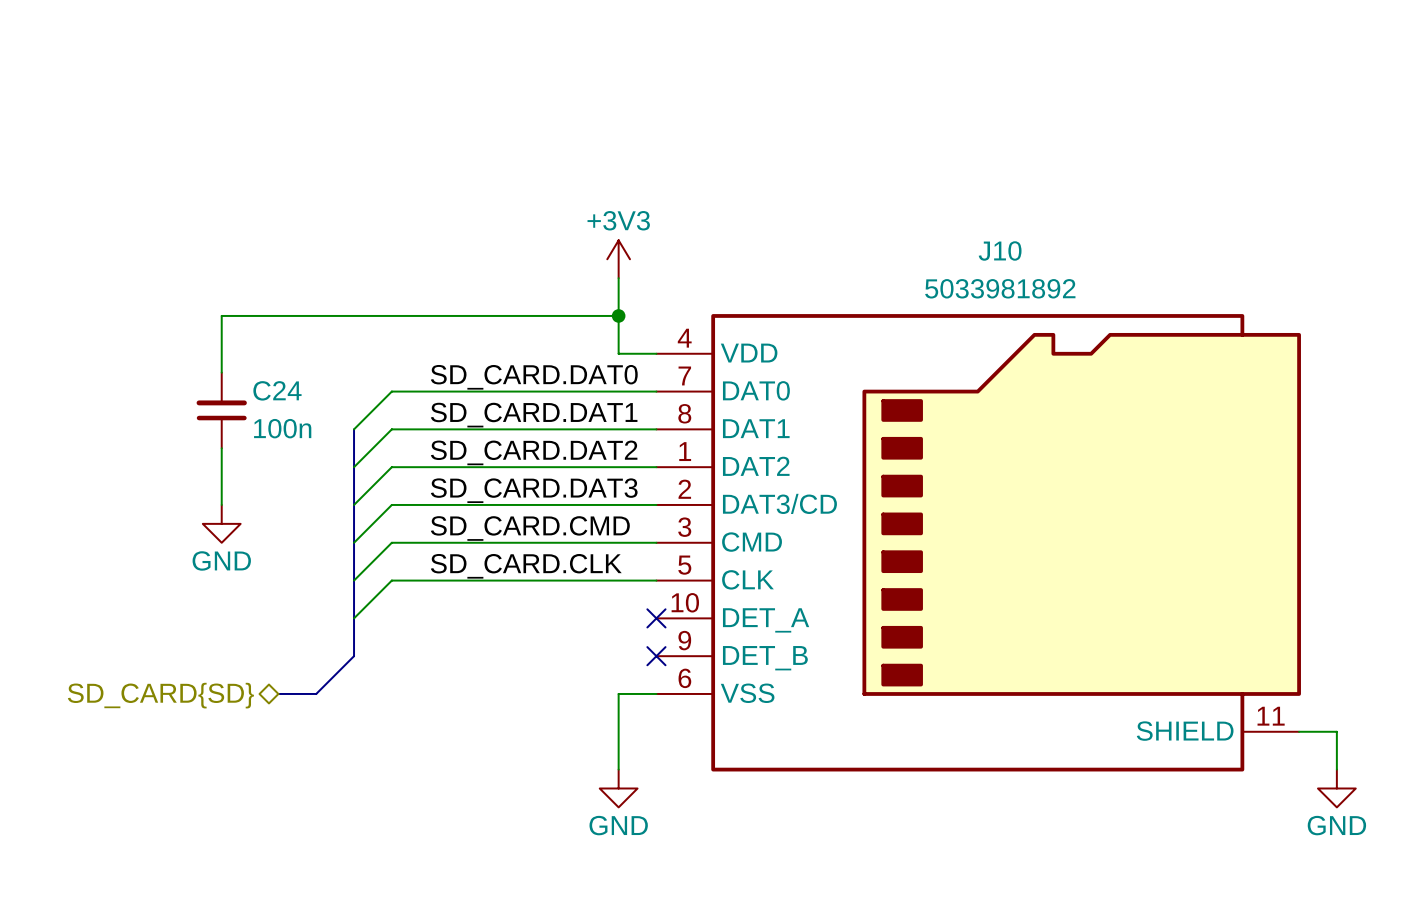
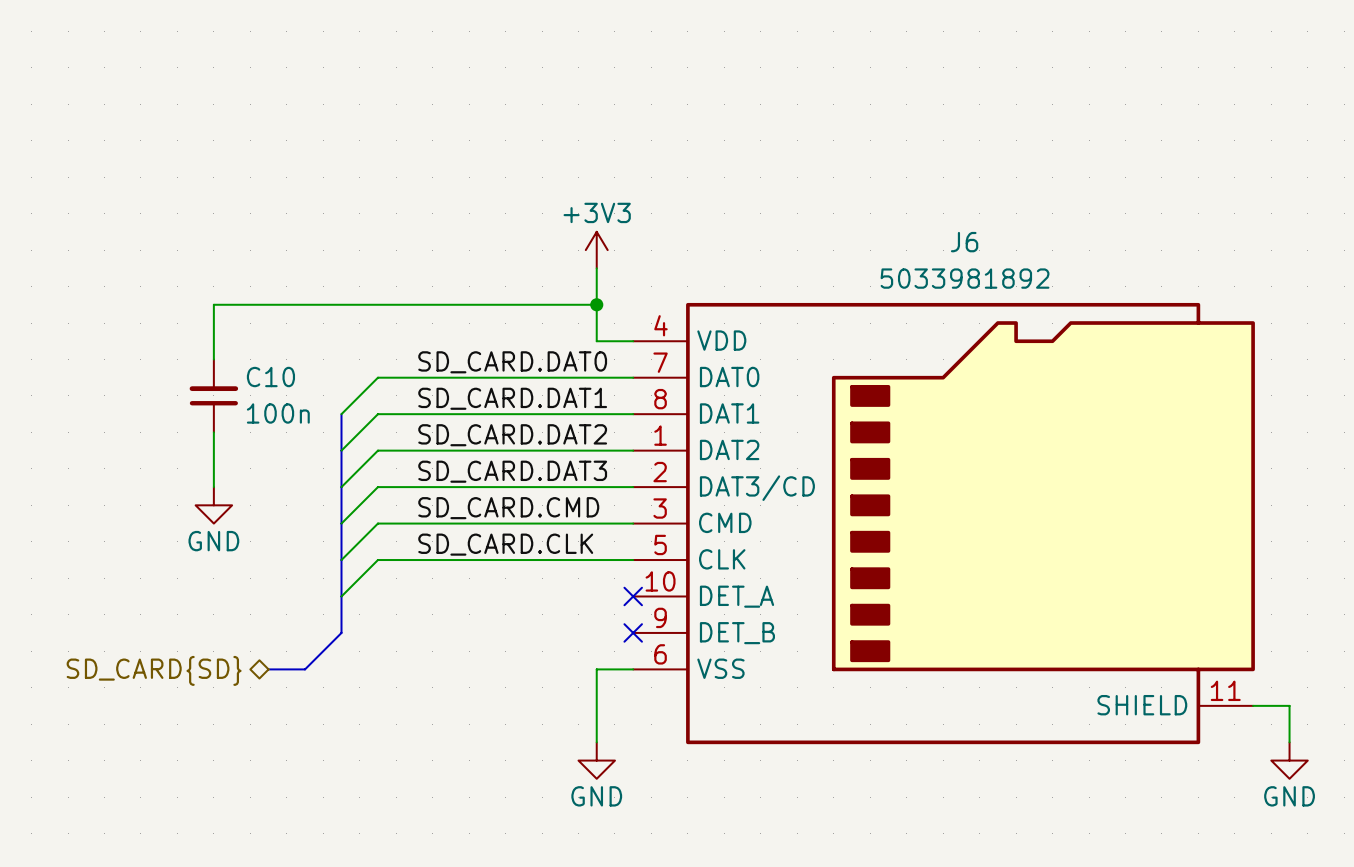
J10 name: J10 (1000, 250) -> J6 (964, 242)
C24 name: C24 (277, 390) -> C10 (270, 377)

